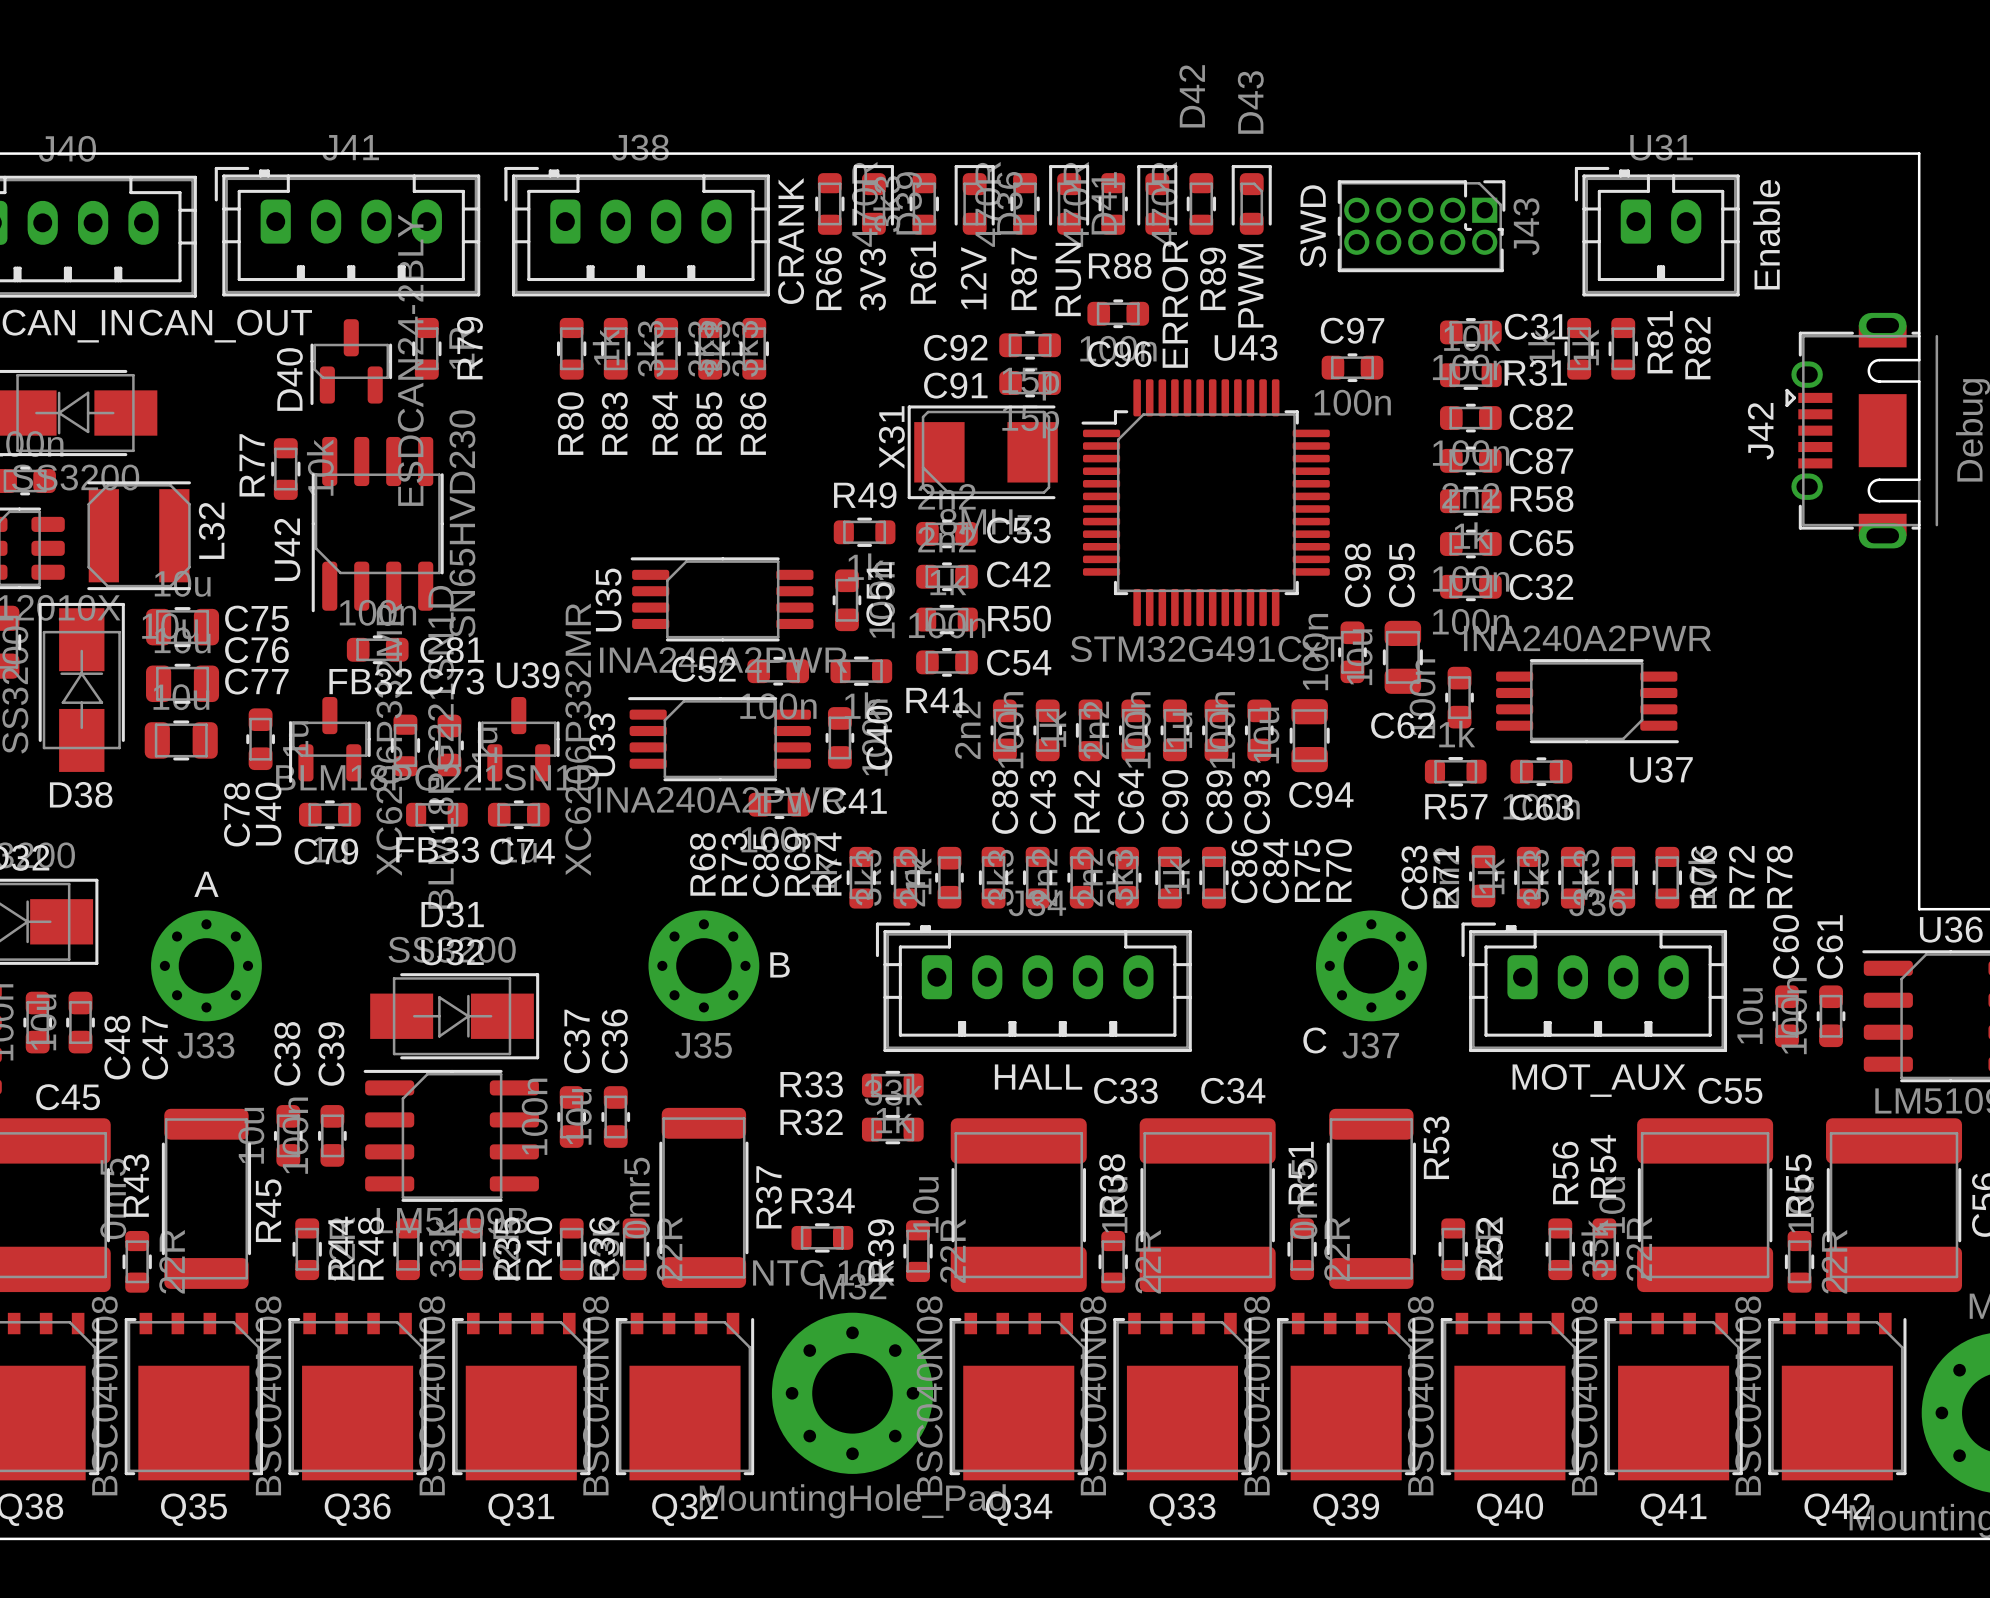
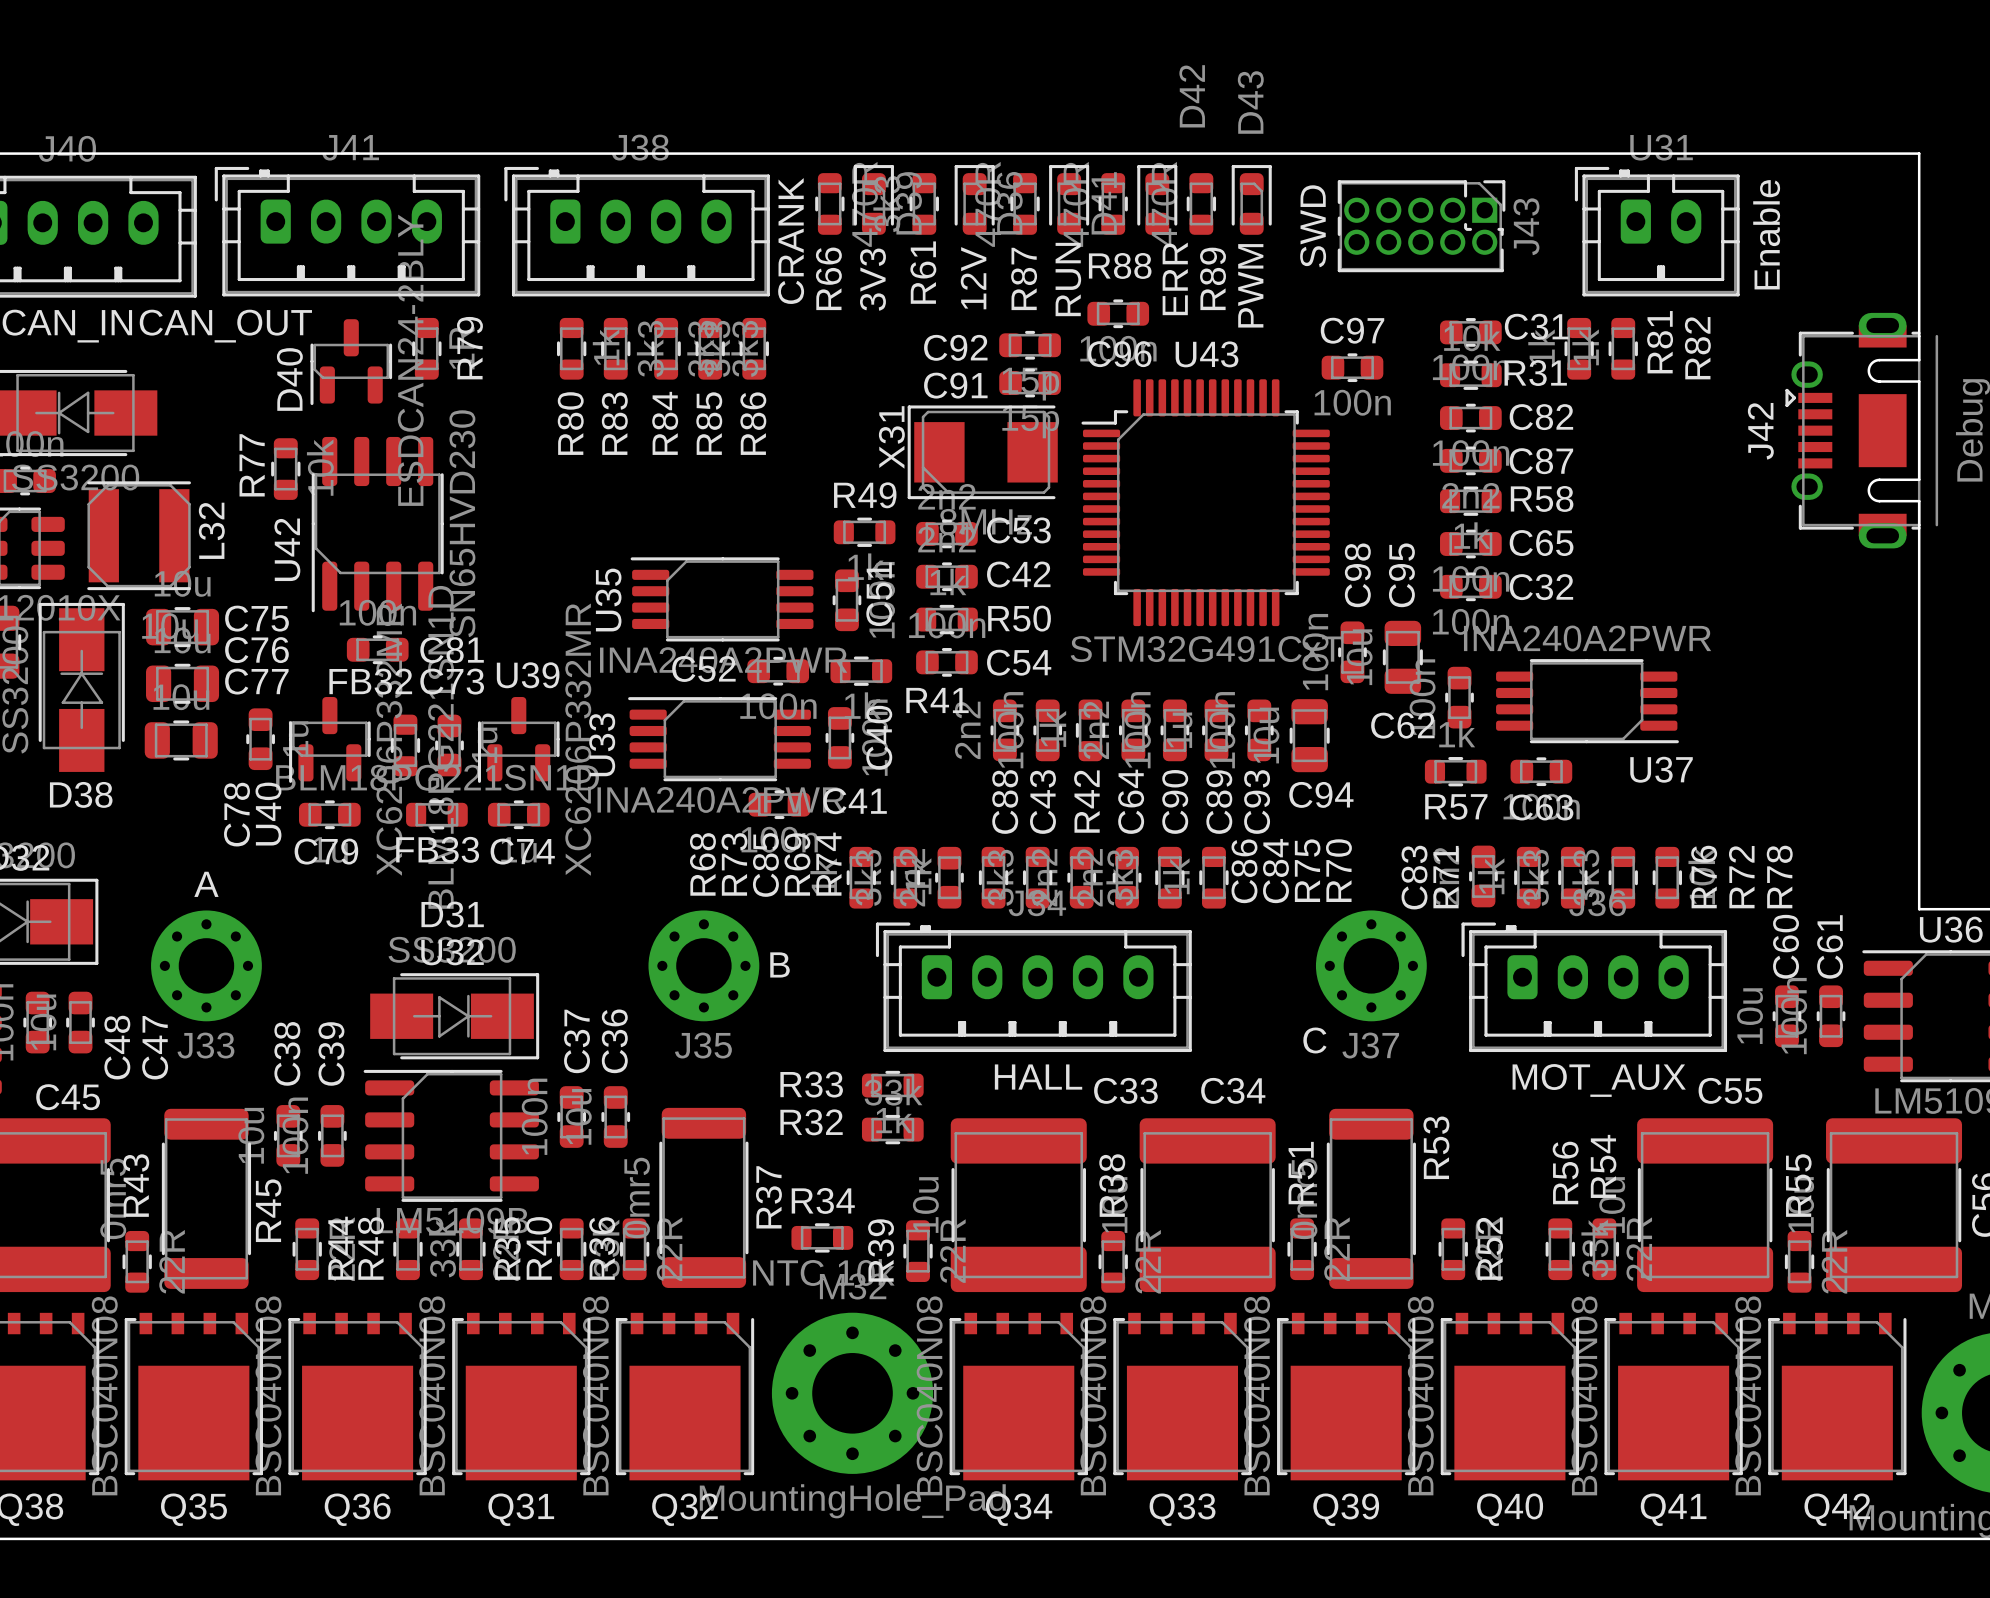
D42 value: ERROR (1175, 304) -> ERR (1175, 278)
U43 name position: U43 (1246, 347) -> U43 (1207, 354)

